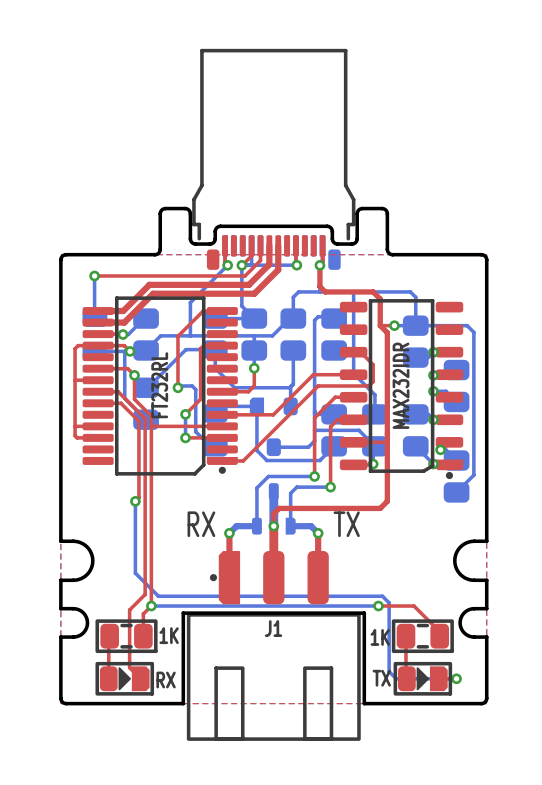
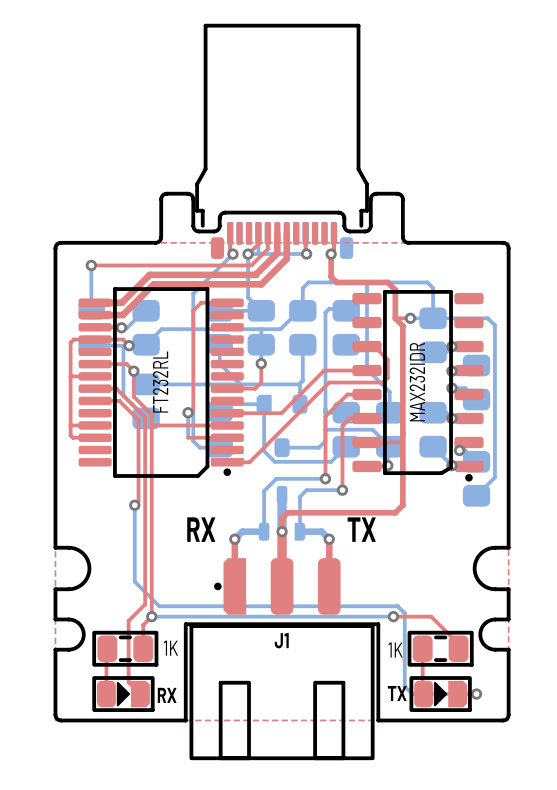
top track: (203, 311) (177, 336) (177, 385) -> (206, 302) (201, 302) (193, 310) (193, 410)
top track: (222, 345) (203, 345) (200, 348) (200, 399) (185, 414) -> none
bottom track: (215, 349) (185, 349) (147, 387) -> none
bottom track: (177, 385) (192, 385) (195, 389) (195, 431) (211, 447) -> none
bottom track: none -> (146, 384) (240, 384)
via: (177, 387) -> none
bottom track: none -> (193, 410) (193, 441) (199, 447) (223, 447)
via: (185, 437) -> none

